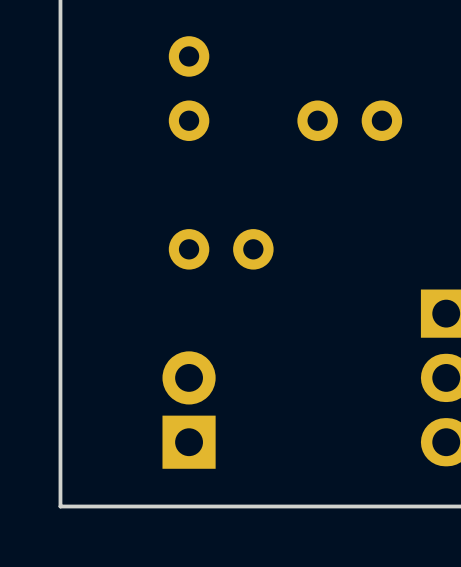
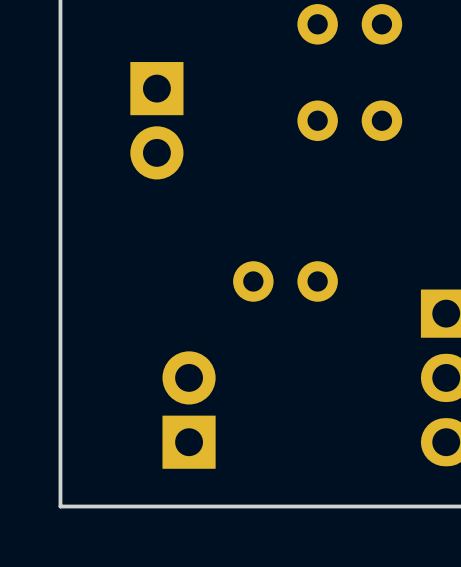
part: none -> (349, 24)
part: (189, 88) -> none
part: none -> (156, 120)
part position: (221, 249) -> (285, 281)

